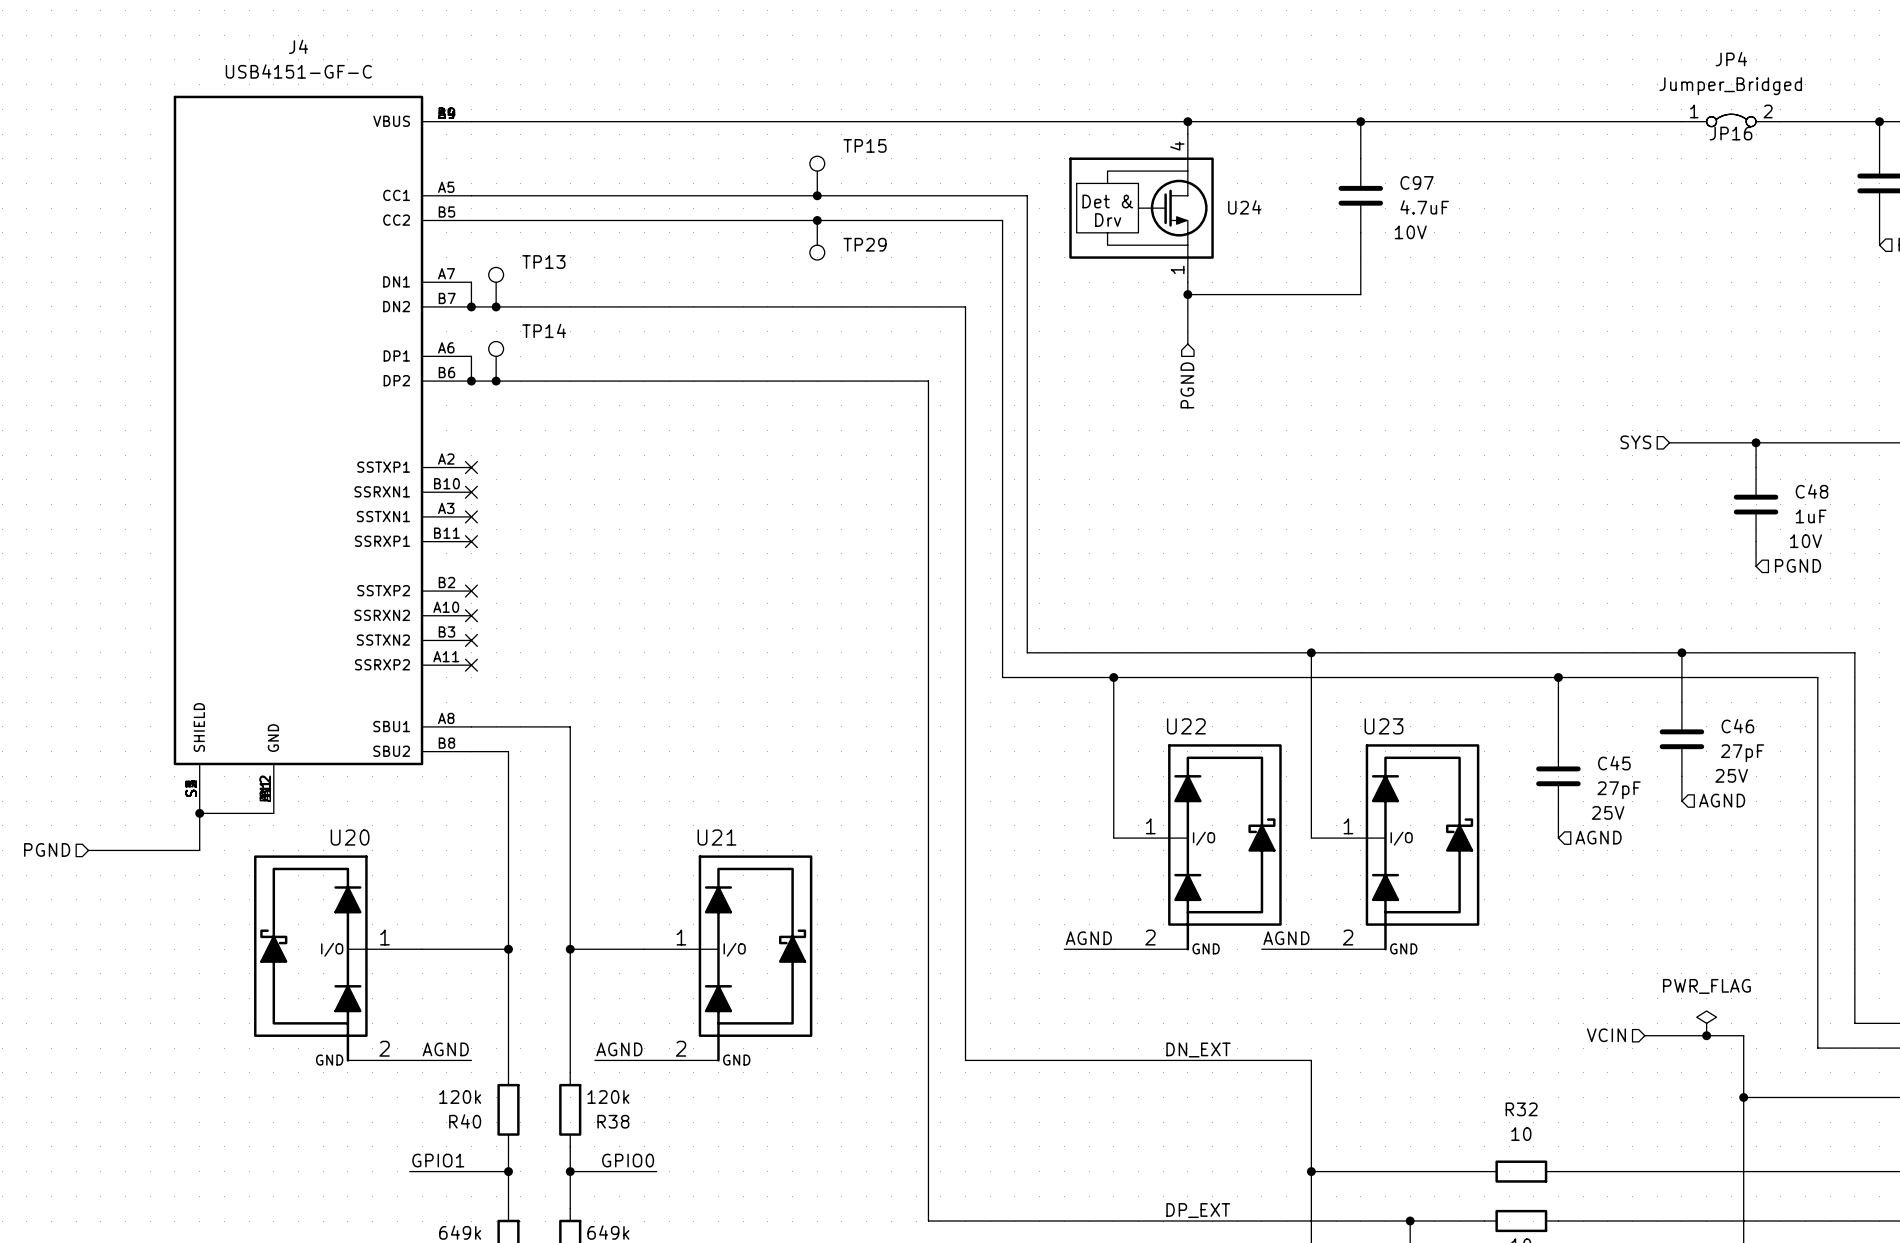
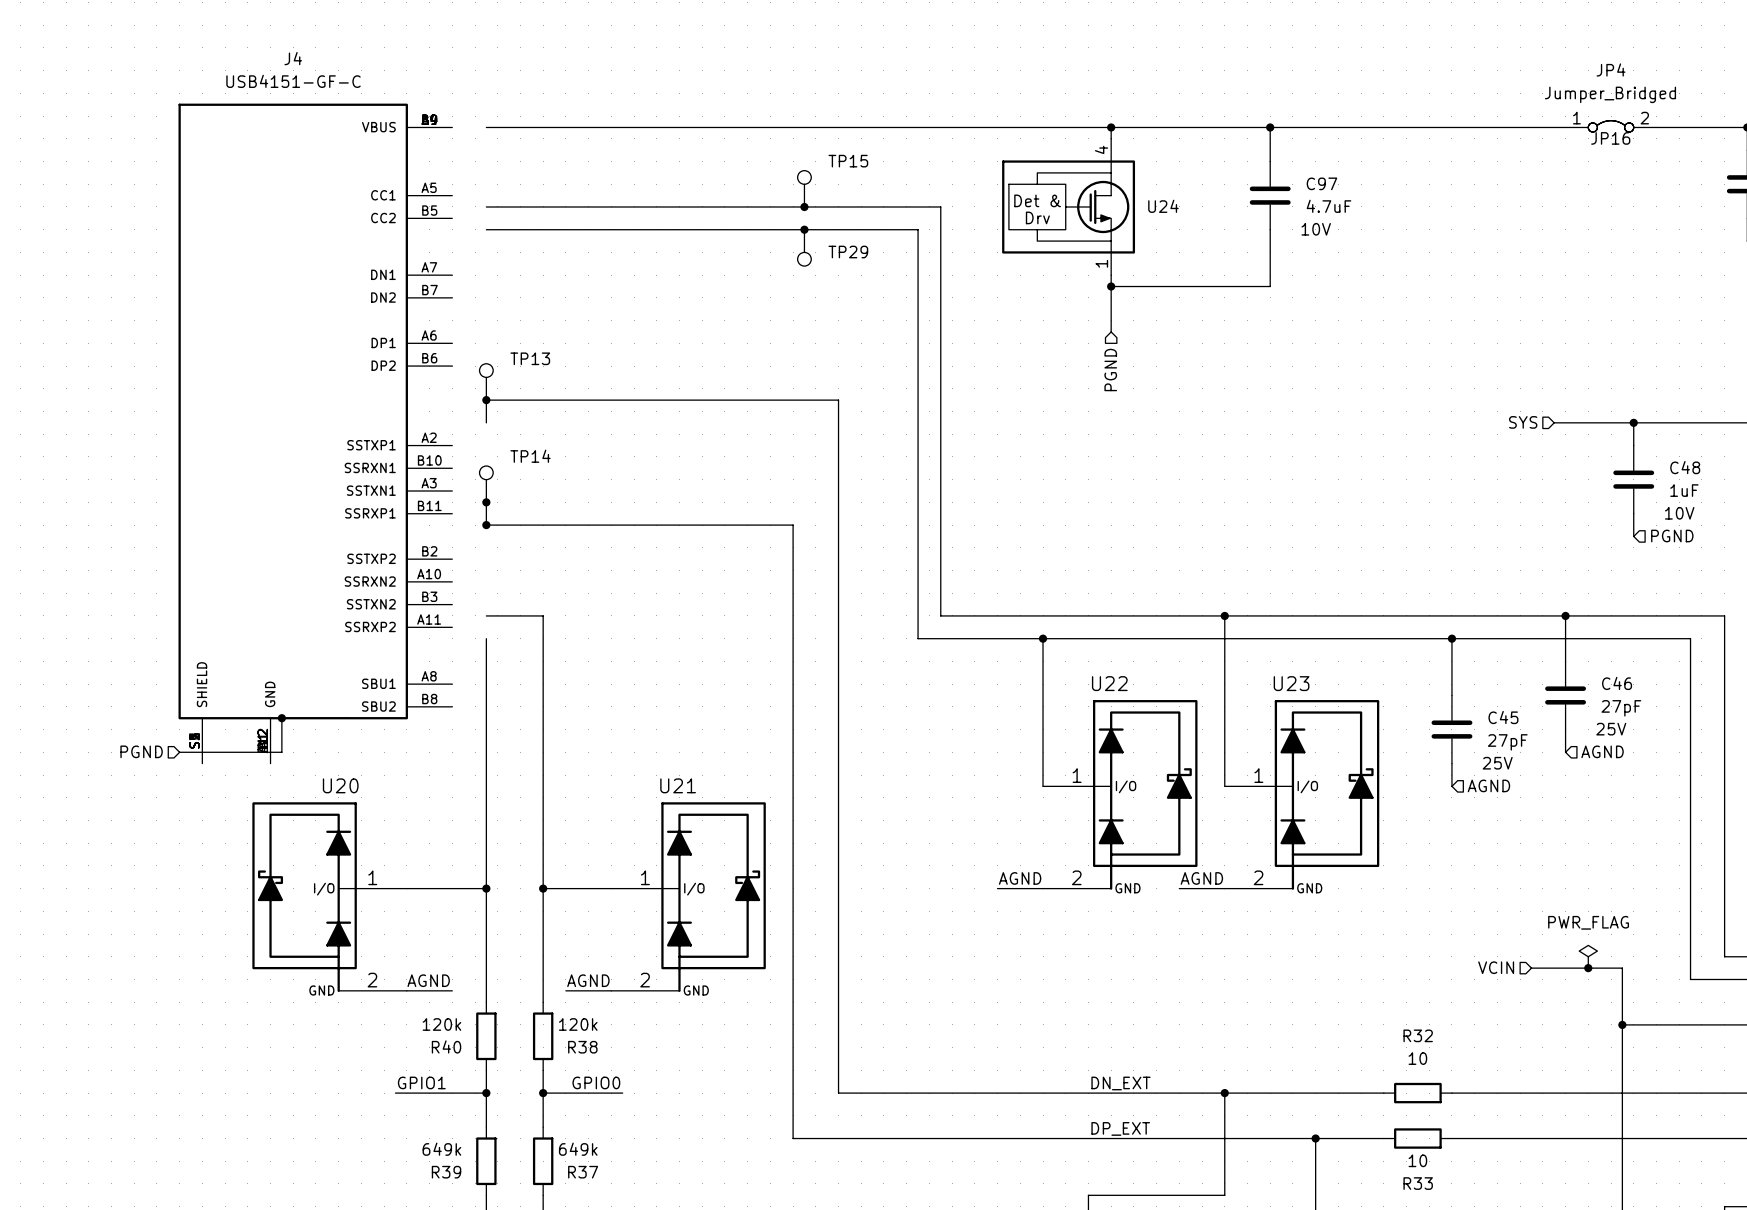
wire: (471, 121) (508, 121) -> none
TP15 position: (817, 176) -> (804, 188)
wire: (471, 195) (1027, 195) (1027, 652) -> none
junction: (817, 195) -> none
junction: none -> (804, 206)
wire: (471, 220) (1002, 220) -> (486, 206) (940, 206) (940, 218)
junction: (817, 220) -> none
wire: none -> (486, 229) (918, 229) (918, 638) (940, 638)
junction: none -> (804, 229)
TP29 position: (817, 240) -> (804, 247)
wire: (471, 282) (471, 306) (965, 306) (965, 1060) (1311, 1060) (1311, 1171) -> (486, 422) (486, 400) (838, 400) (838, 1093) (1224, 1093)
TP13 position: (496, 287) -> (486, 381)
junction: (471, 306) -> none
junction: (496, 306) -> none
wire: (471, 356) (471, 381) (928, 381) (928, 1221) -> (486, 502) (486, 525) (793, 525) (793, 1138) (872, 1138)
TP14 position: (496, 361) -> (486, 484)
junction: (471, 381) -> none
junction: (496, 381) -> none
junction: none -> (486, 400)
no-connect mark: (471, 467) -> none
no-connect mark: (471, 492) -> none
no-connect mark: (471, 516) -> none
junction: none -> (486, 502)
no-connect mark: (471, 541) -> none
junction: none -> (486, 525)
no-connect mark: (471, 591) -> none
no-connect mark: (471, 615) -> none
no-connect mark: (471, 640) -> none
wire: (1002, 652) (1002, 677) -> (940, 615) (963, 615)
no-connect mark: (471, 665) -> none
wire: (471, 726) (570, 726) -> (486, 615) (543, 615) (543, 684)
wire: (471, 751) (508, 751) -> (486, 638) (486, 706)
junction: none -> (281, 718)
junction: (199, 813) -> none
wire: (273, 813) (199, 813) (199, 850) (88, 850) -> (350, 718) (281, 718) (281, 752) (179, 752)
hierarchical label position: PGND (47, 849) -> PGND (141, 751)
label position: DN_EXT (1198, 1049) -> DN_EXT (1120, 1083)

